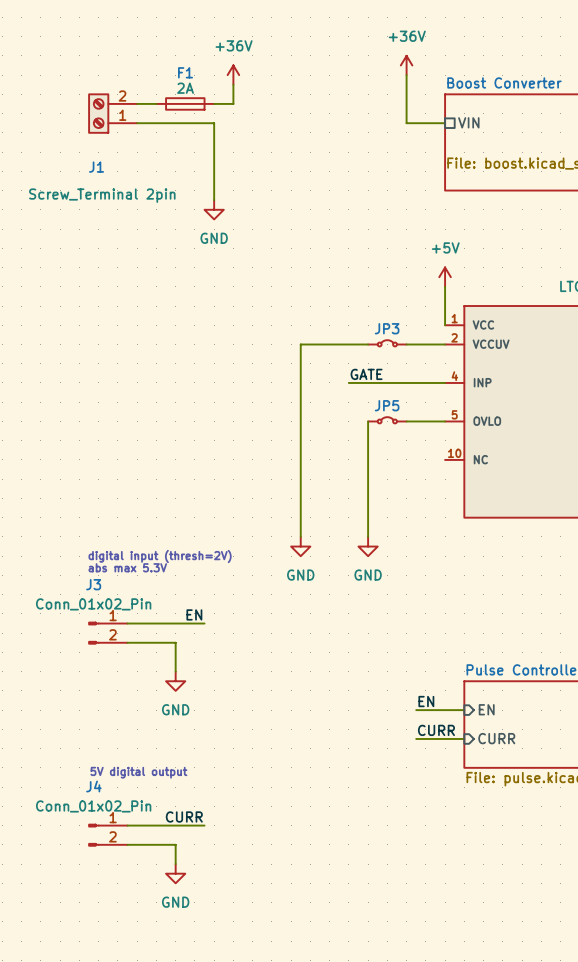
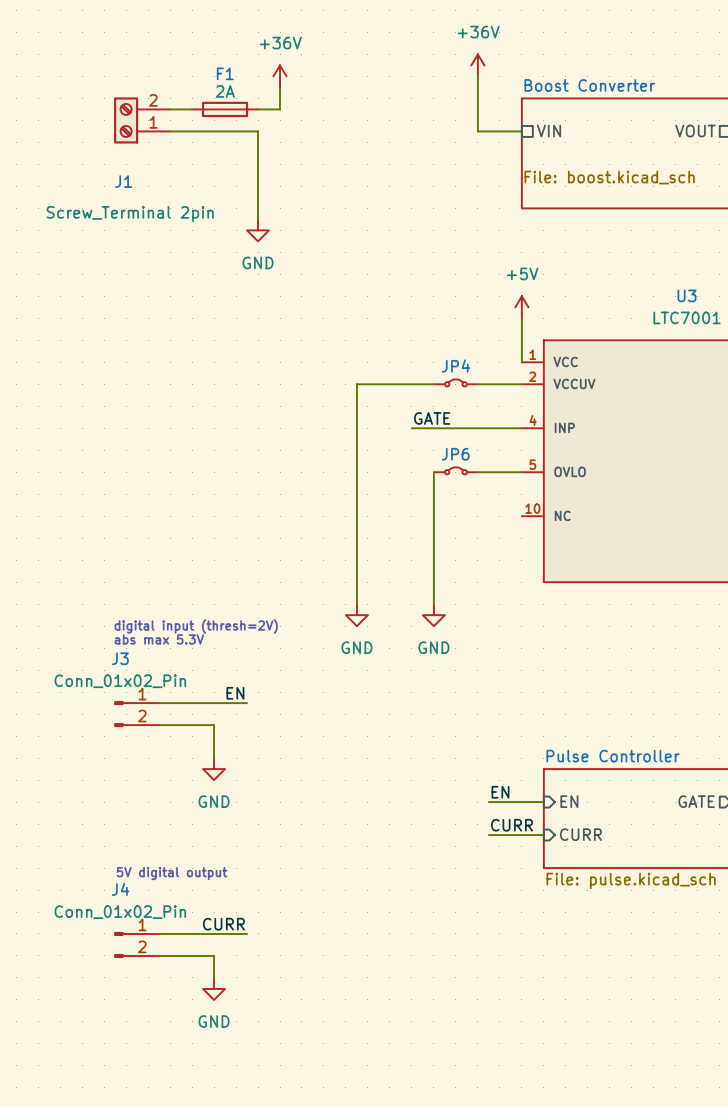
JP3 name: JP3 (387, 328) -> JP4 (455, 366)
JP5 name: JP5 (387, 405) -> JP6 (455, 454)

